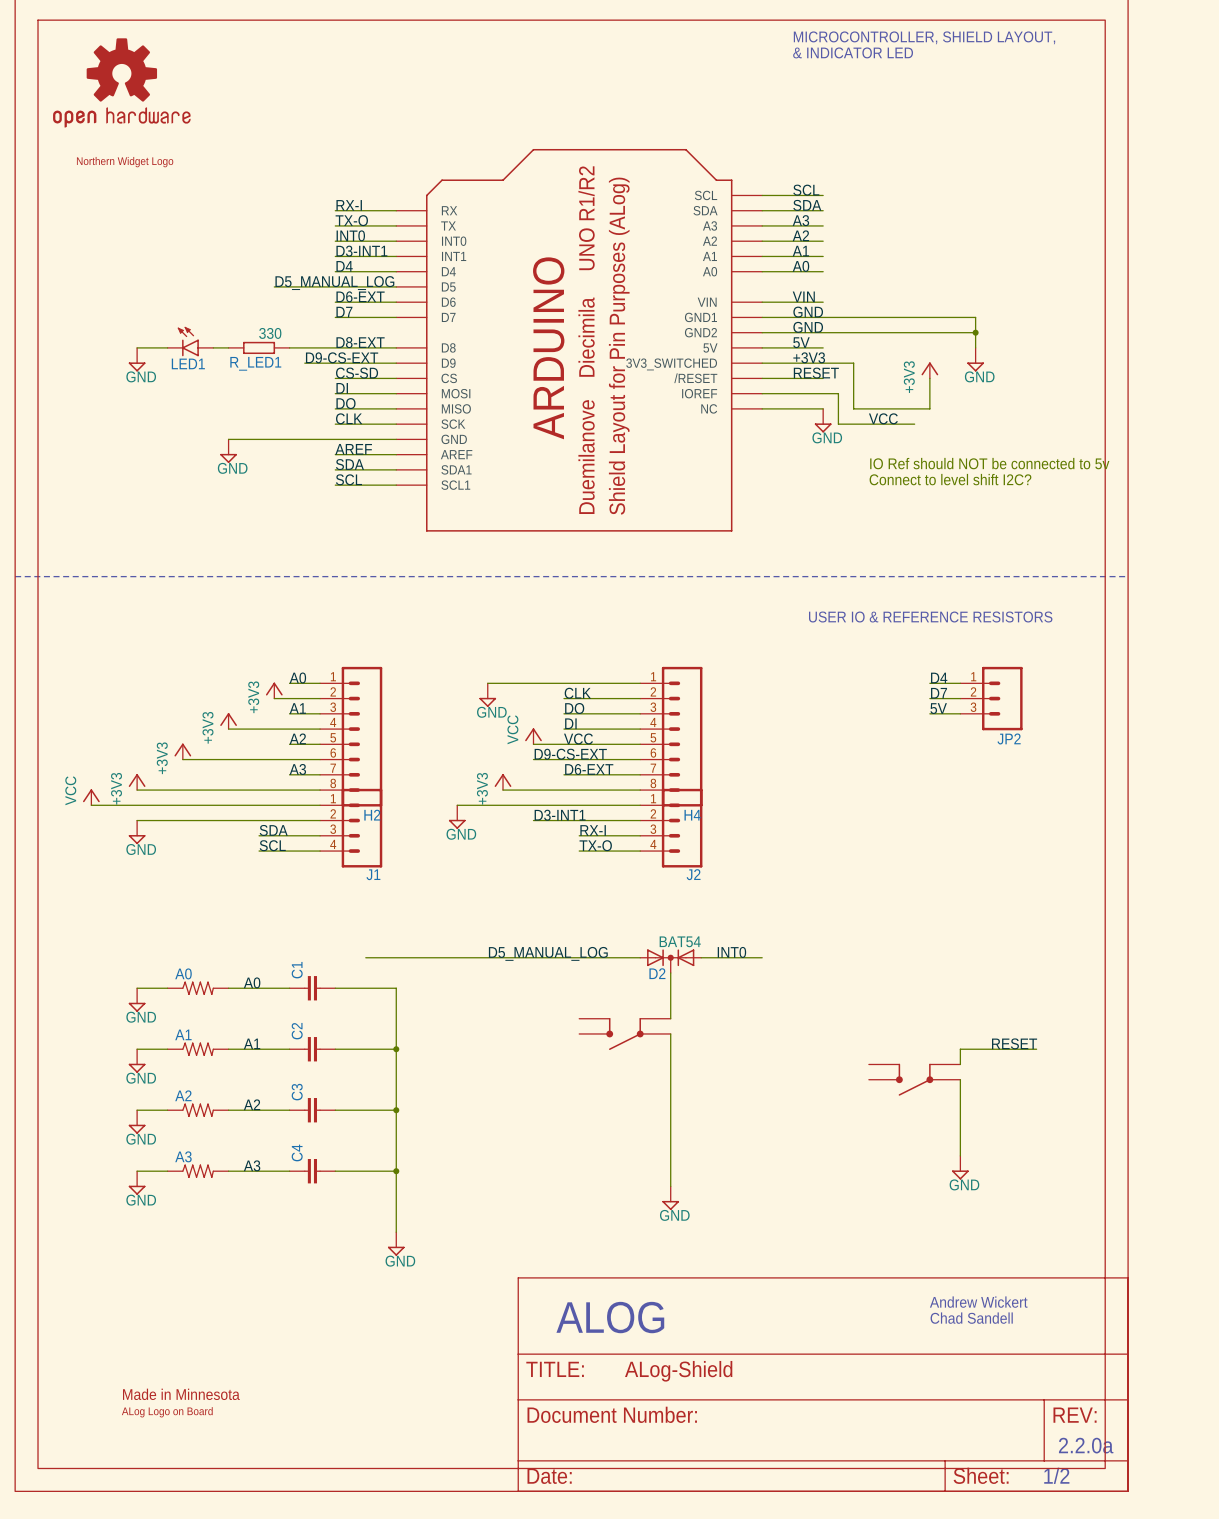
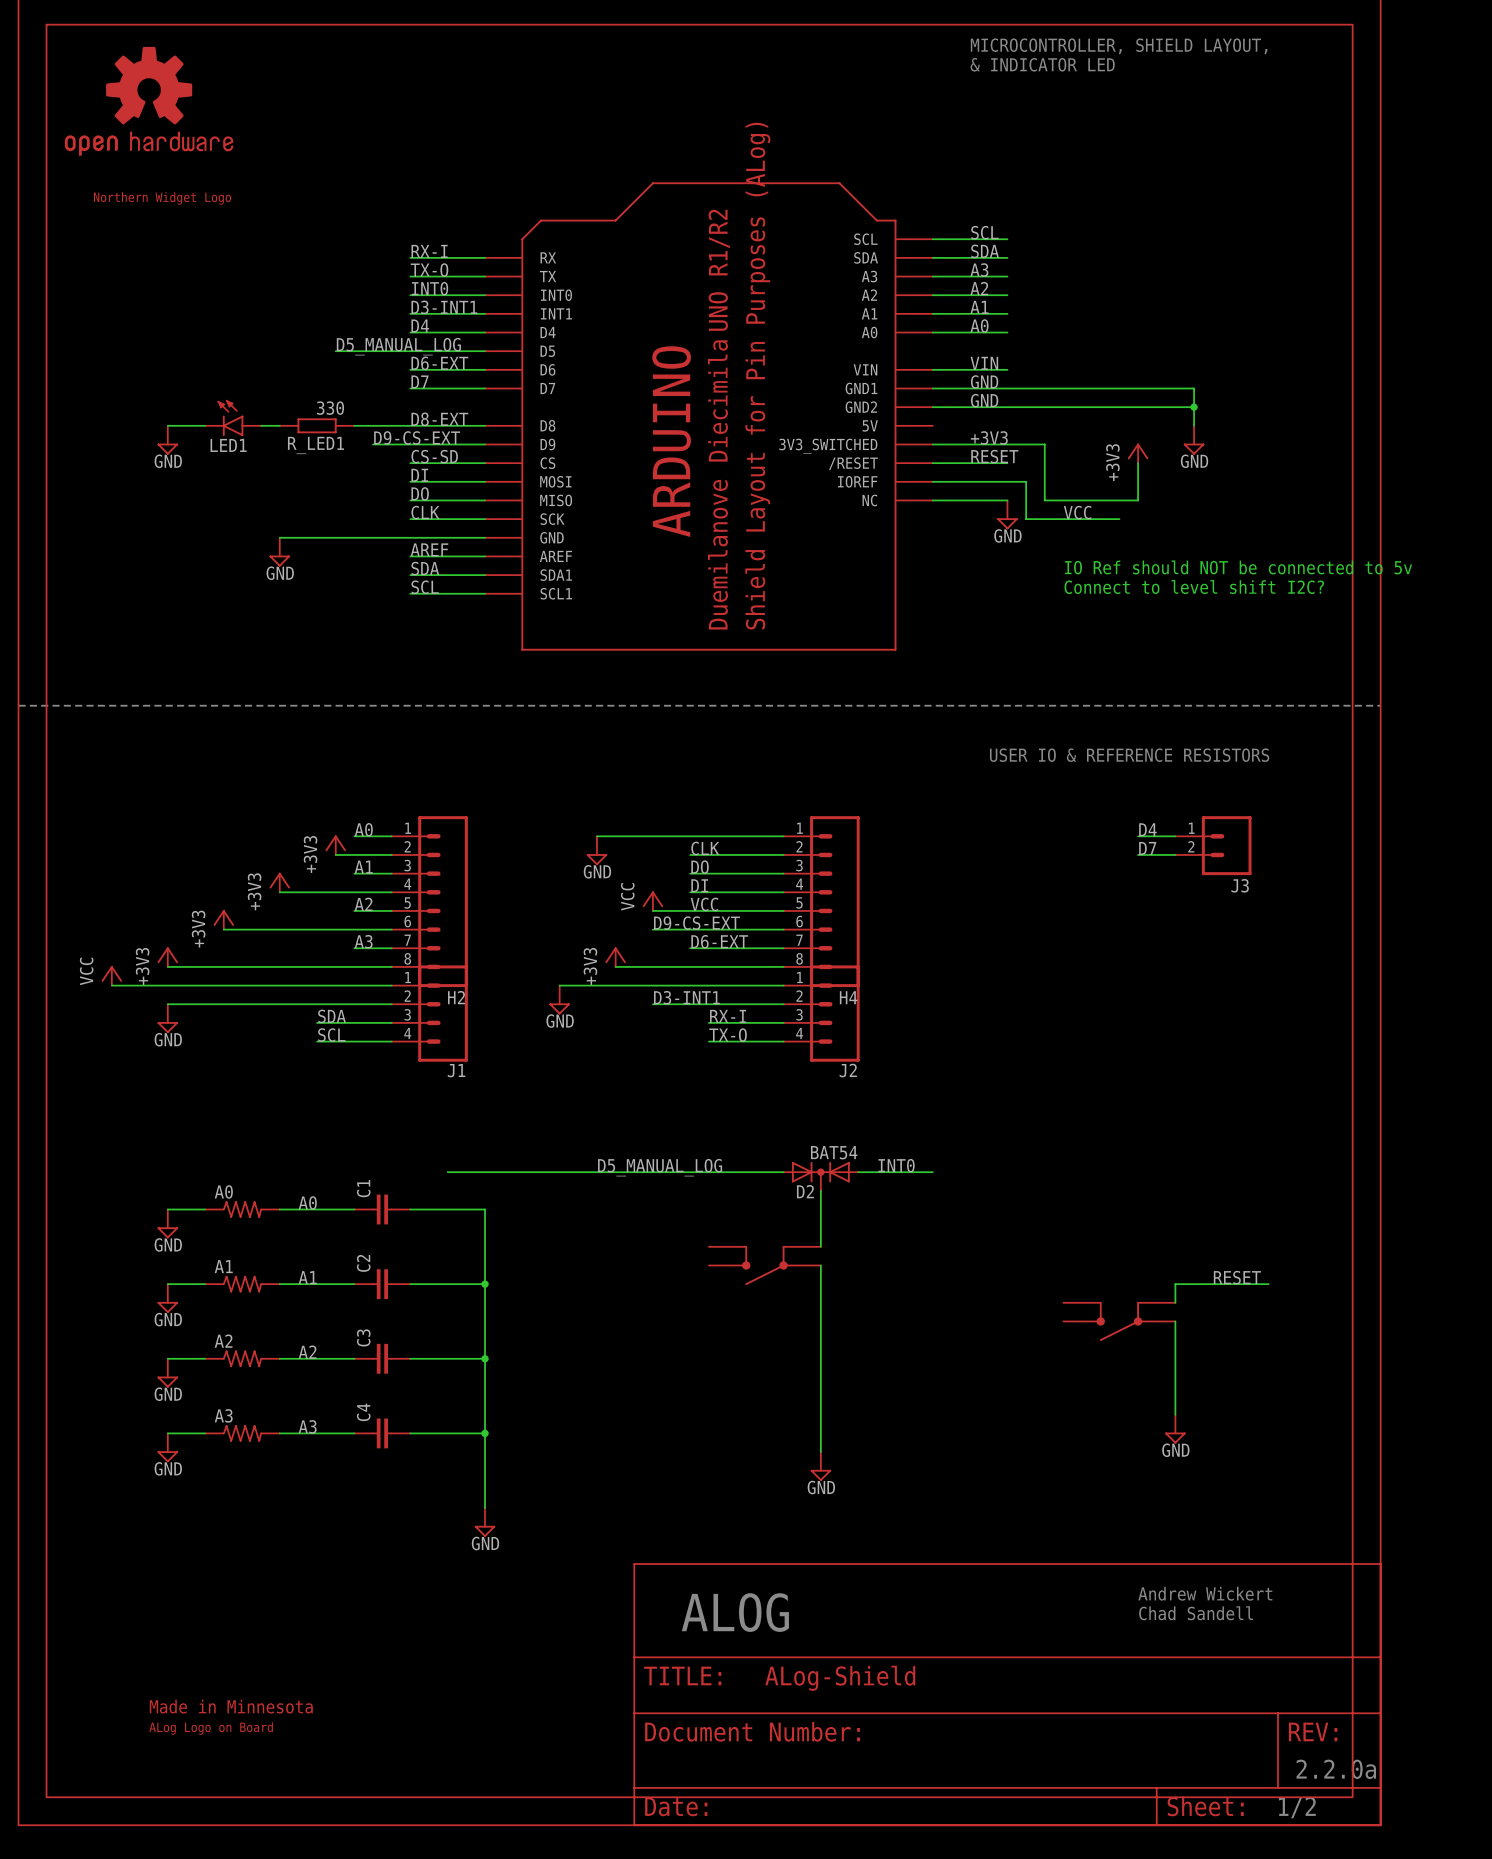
label: 5V (801, 342) -> none
wire: (762, 347) (823, 347) -> none
J3: none -> (1213, 845)
JP2: (991, 698) -> none
label: 5V (938, 708) -> none
wire: (929, 713) (960, 713) -> none

